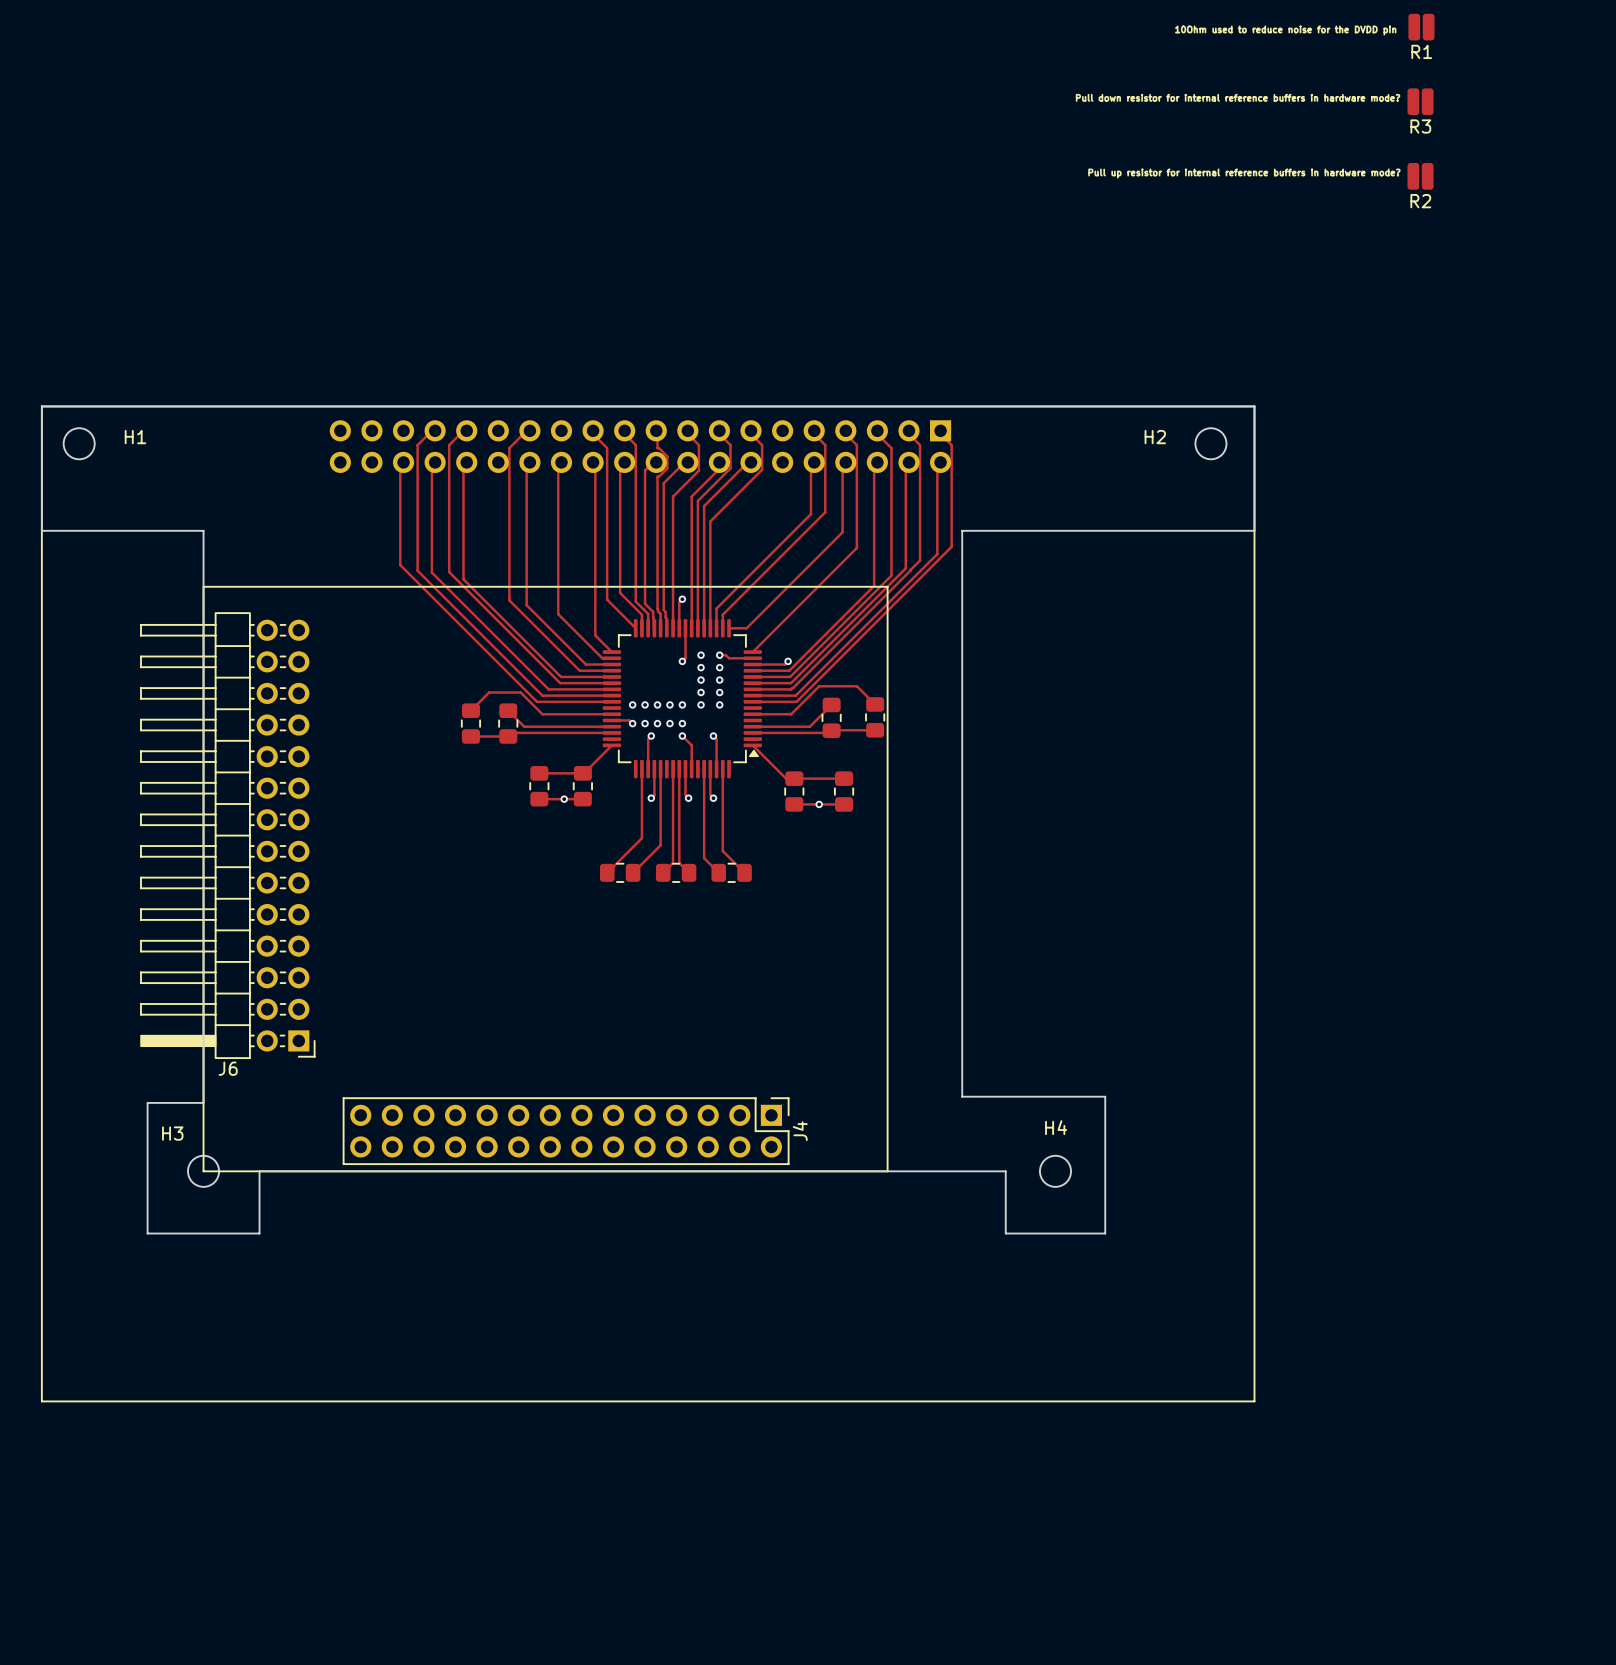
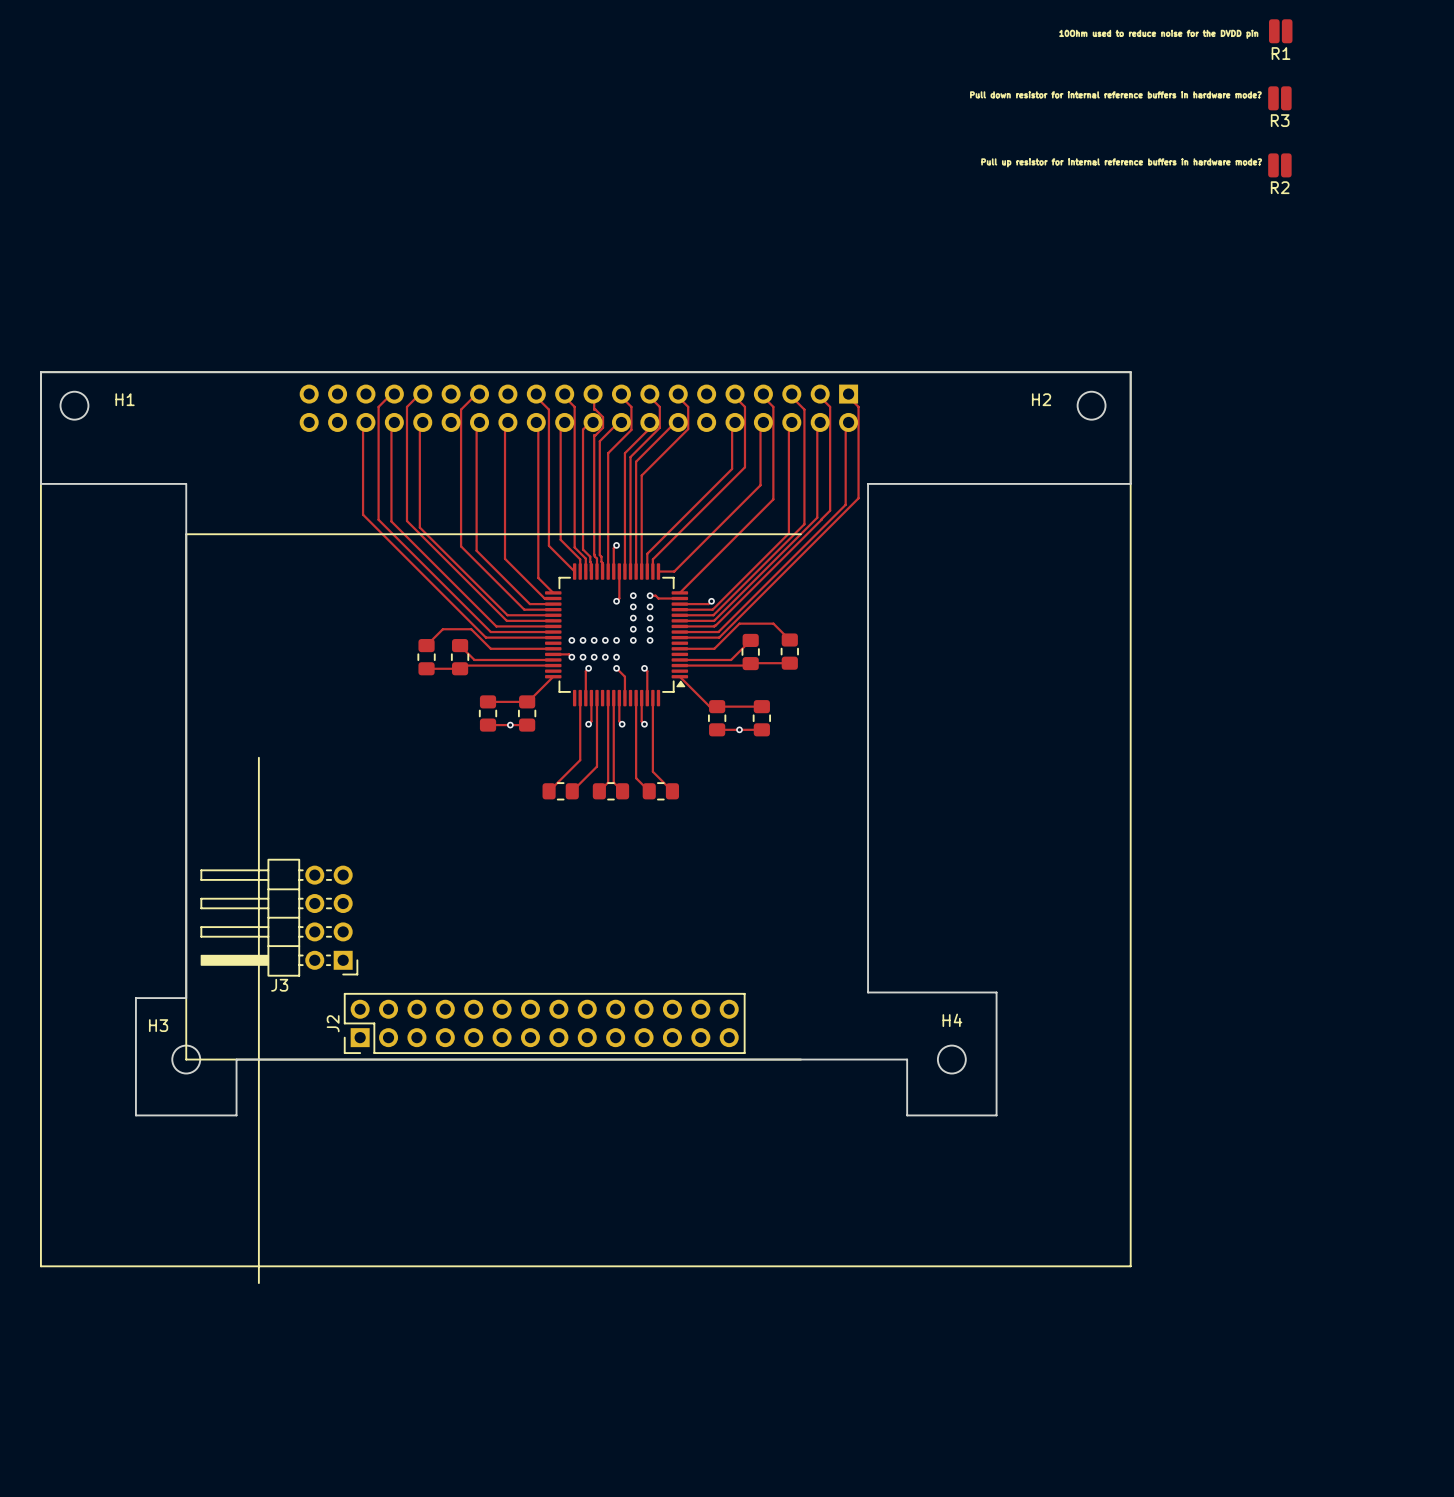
line: (887, 586) (887, 1171) -> none
J6: (227, 835) -> none
line: none -> (258, 757) (258, 1283)
J3: none -> (279, 917)
J4: (566, 1131) -> none
J2: none -> (544, 1023)

